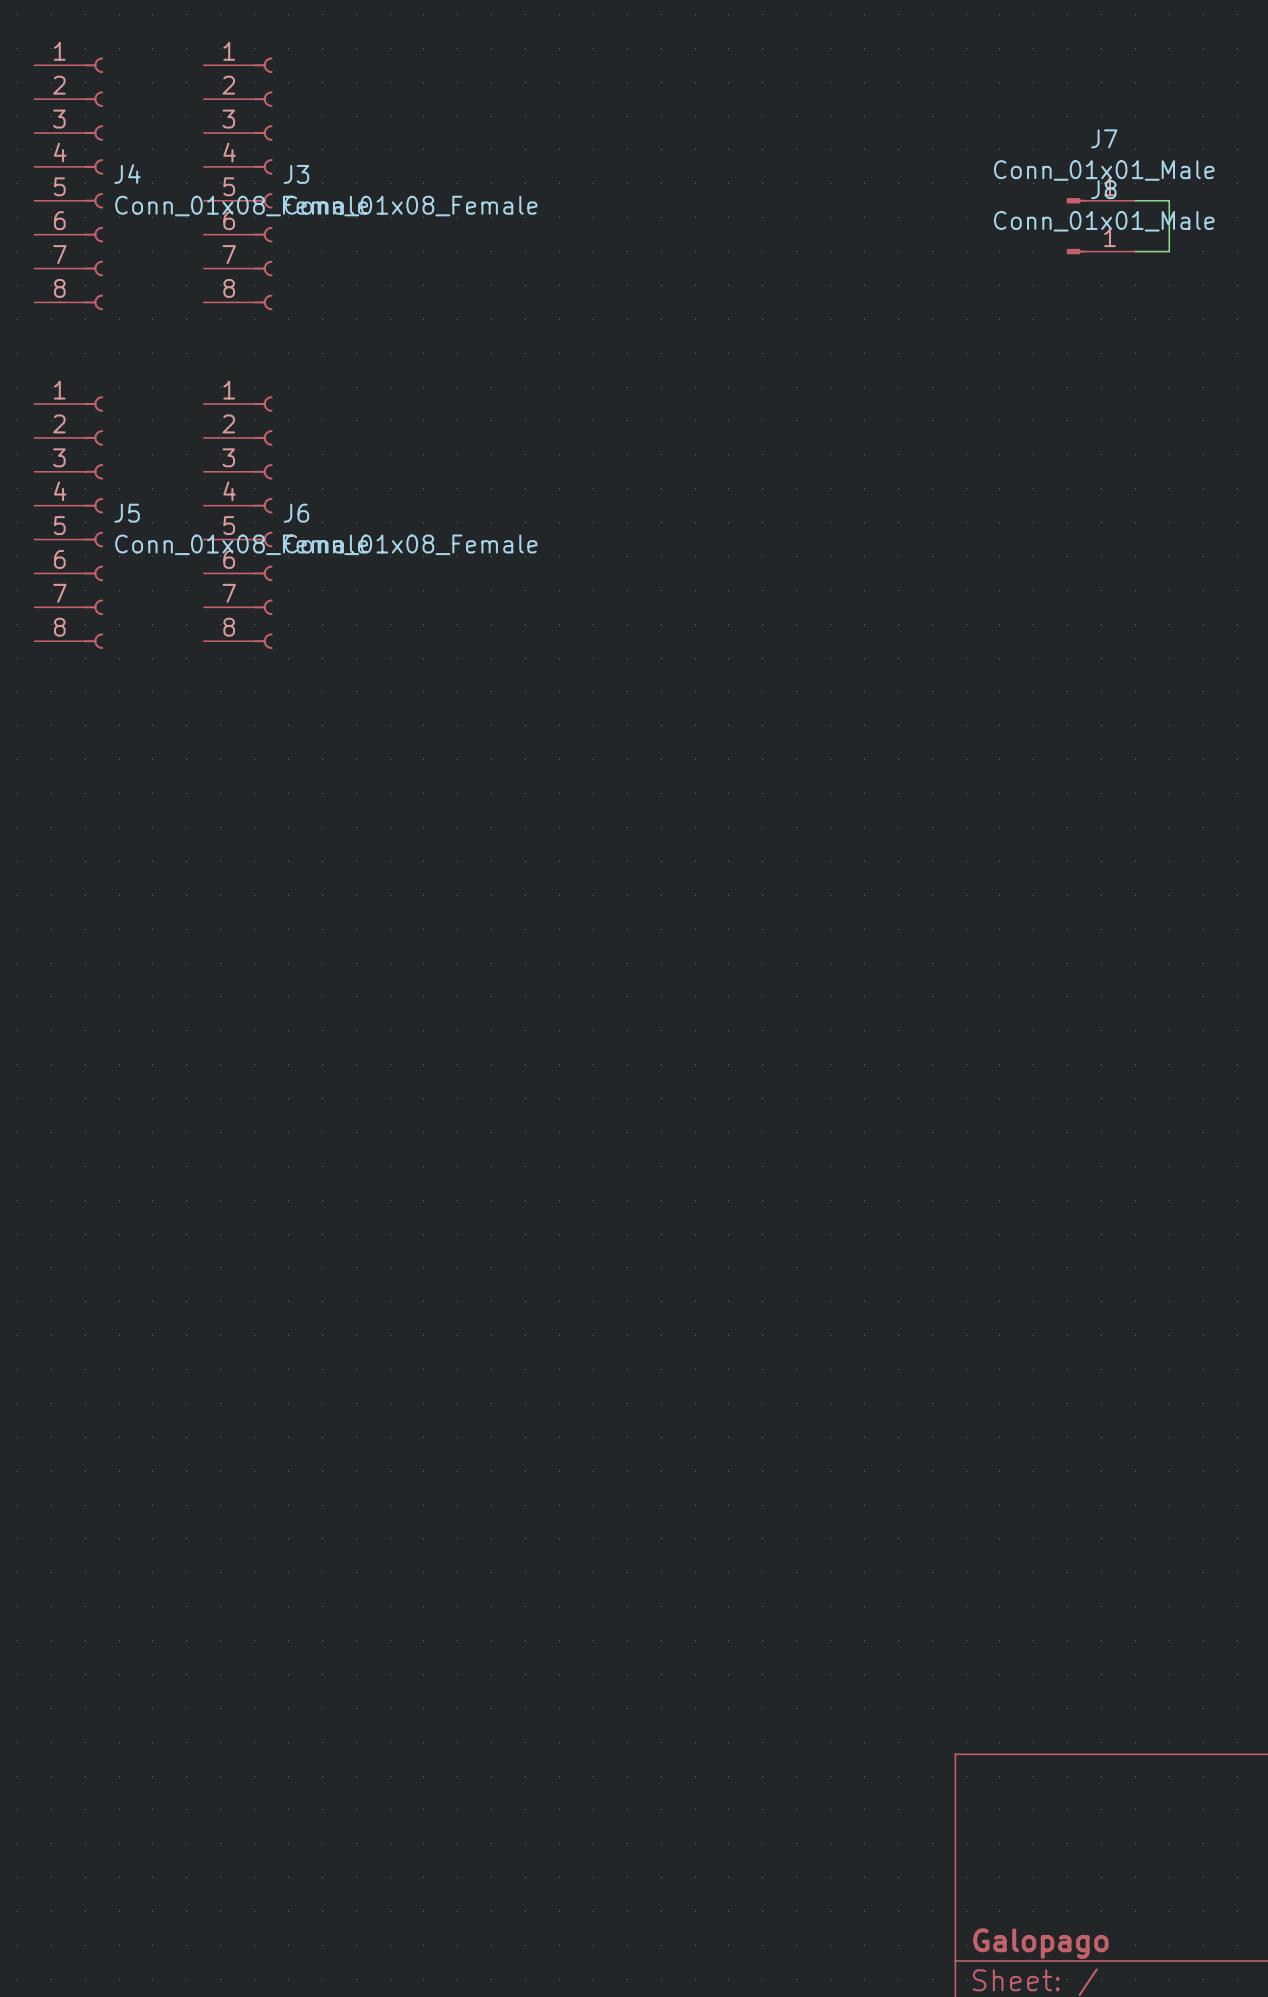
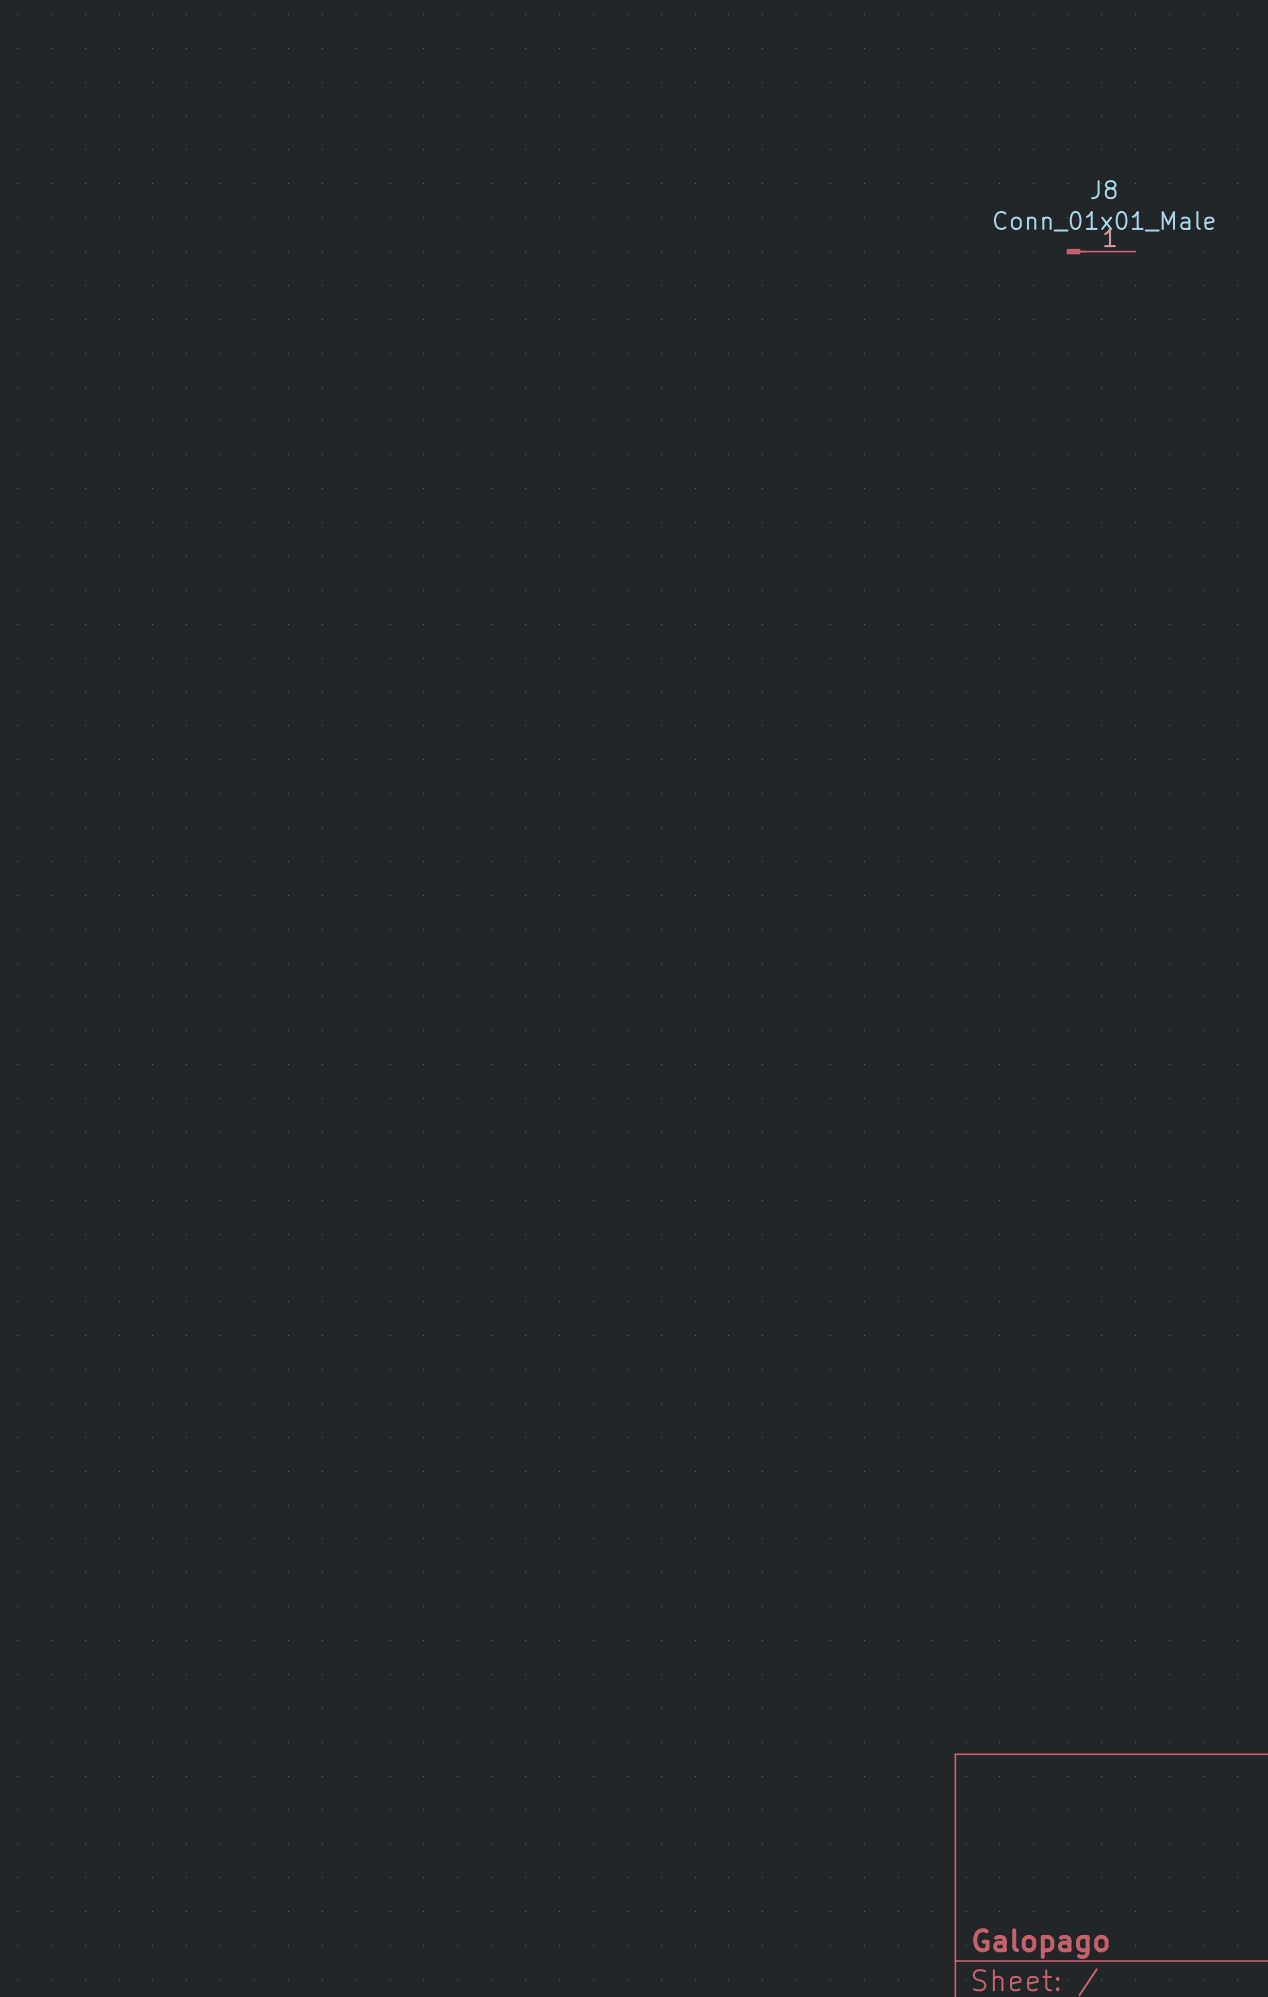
J4: Conn_01x08_Female (68, 183) -> none
J3: Conn_01x08_Female (238, 183) -> none
J7: Conn_01x01_Male (1101, 200) -> none
wire: (1135, 200) (1169, 200) (1169, 251) (1135, 251) -> none
J5: Conn_01x08_Female (68, 522) -> none
J6: Conn_01x08_Female (238, 522) -> none

